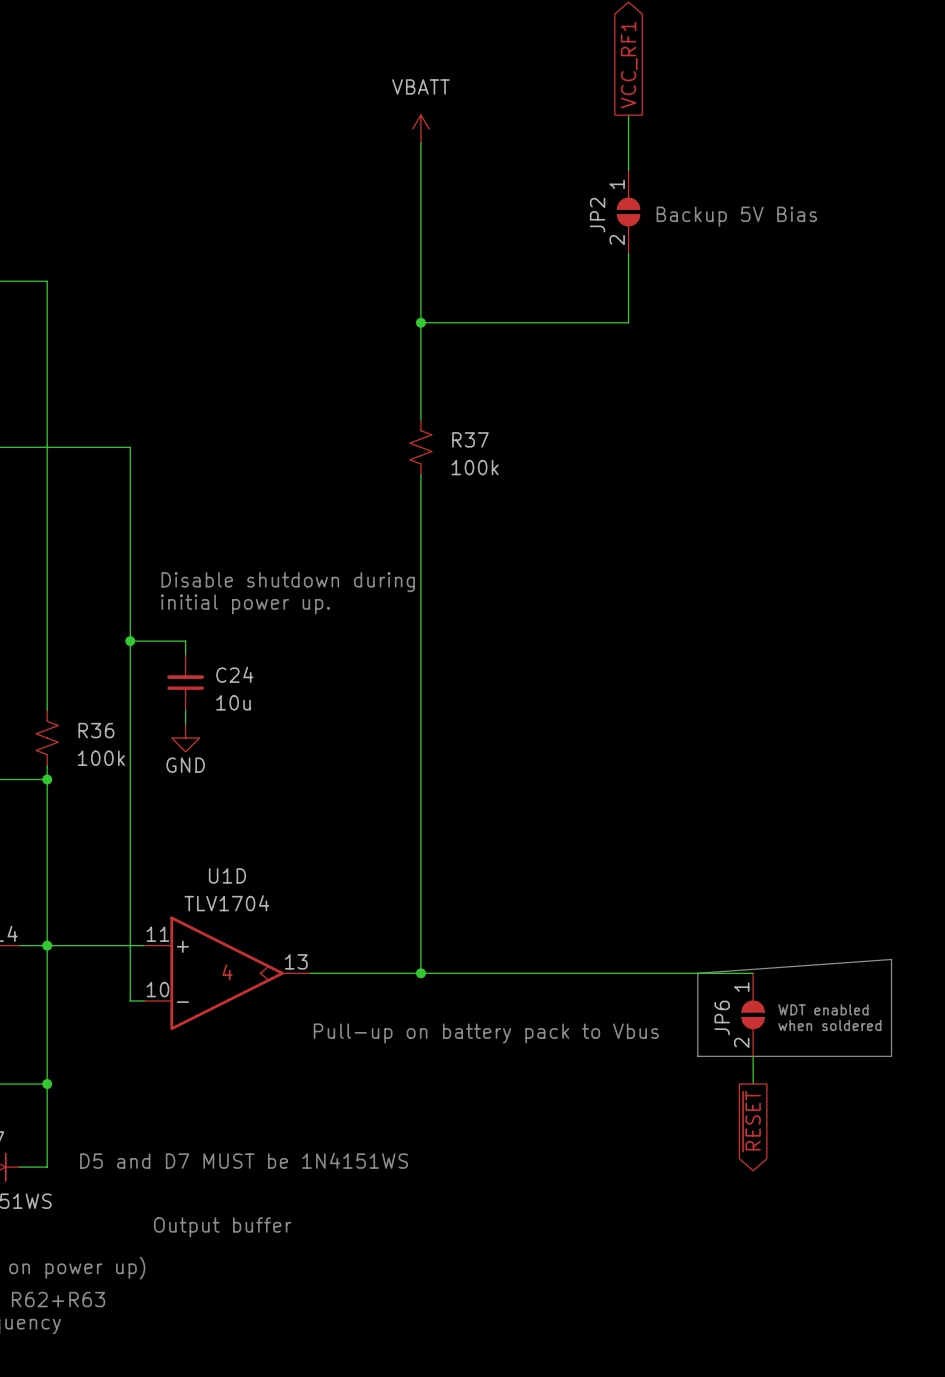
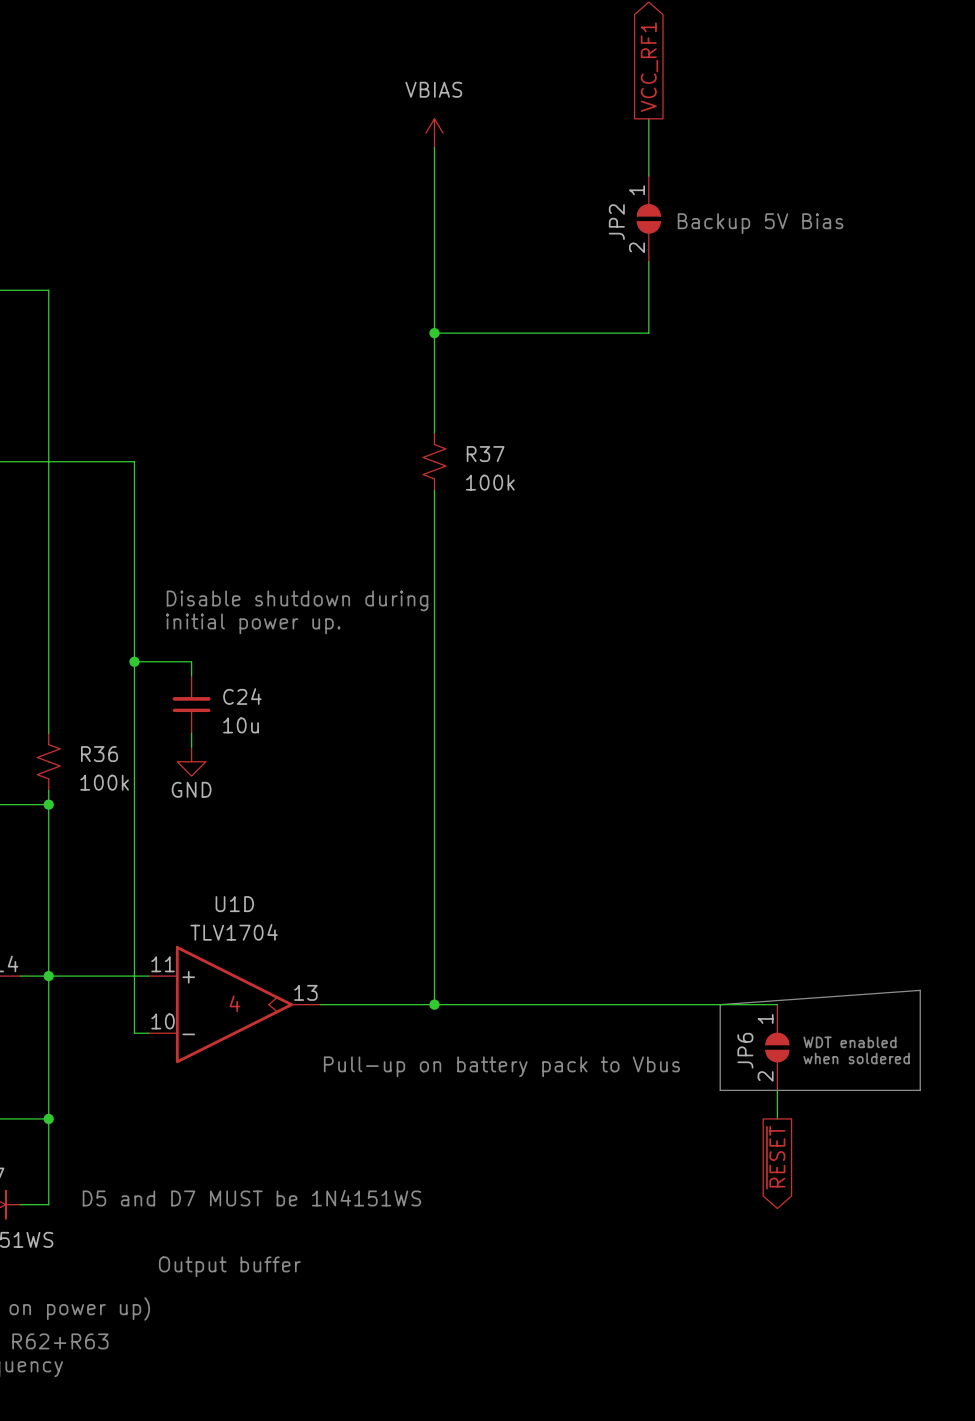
power symbol: VBATT (420, 128) -> VBIAS (434, 133)

